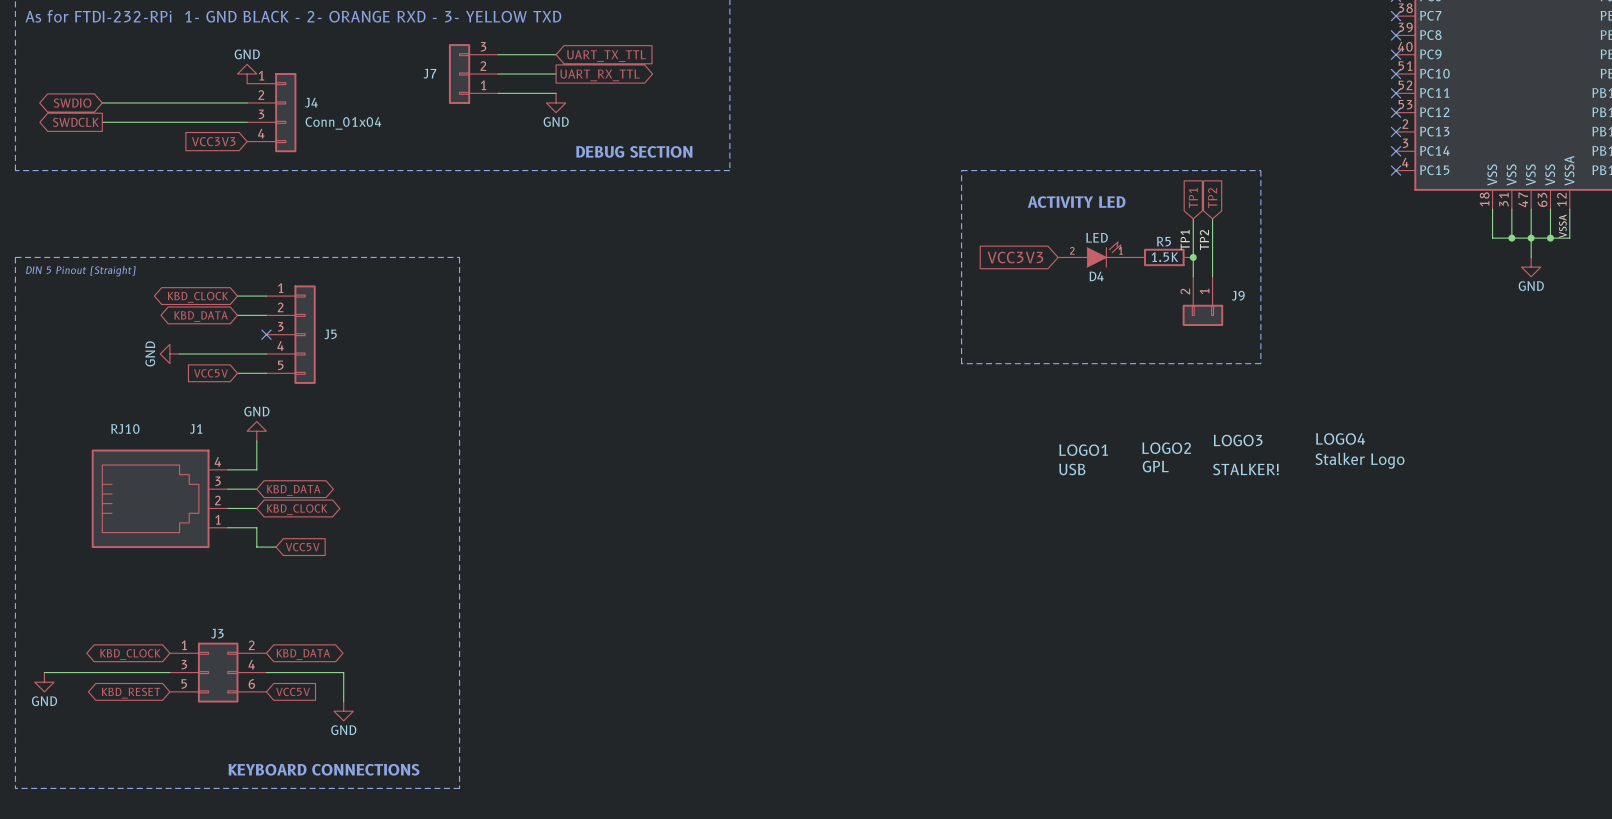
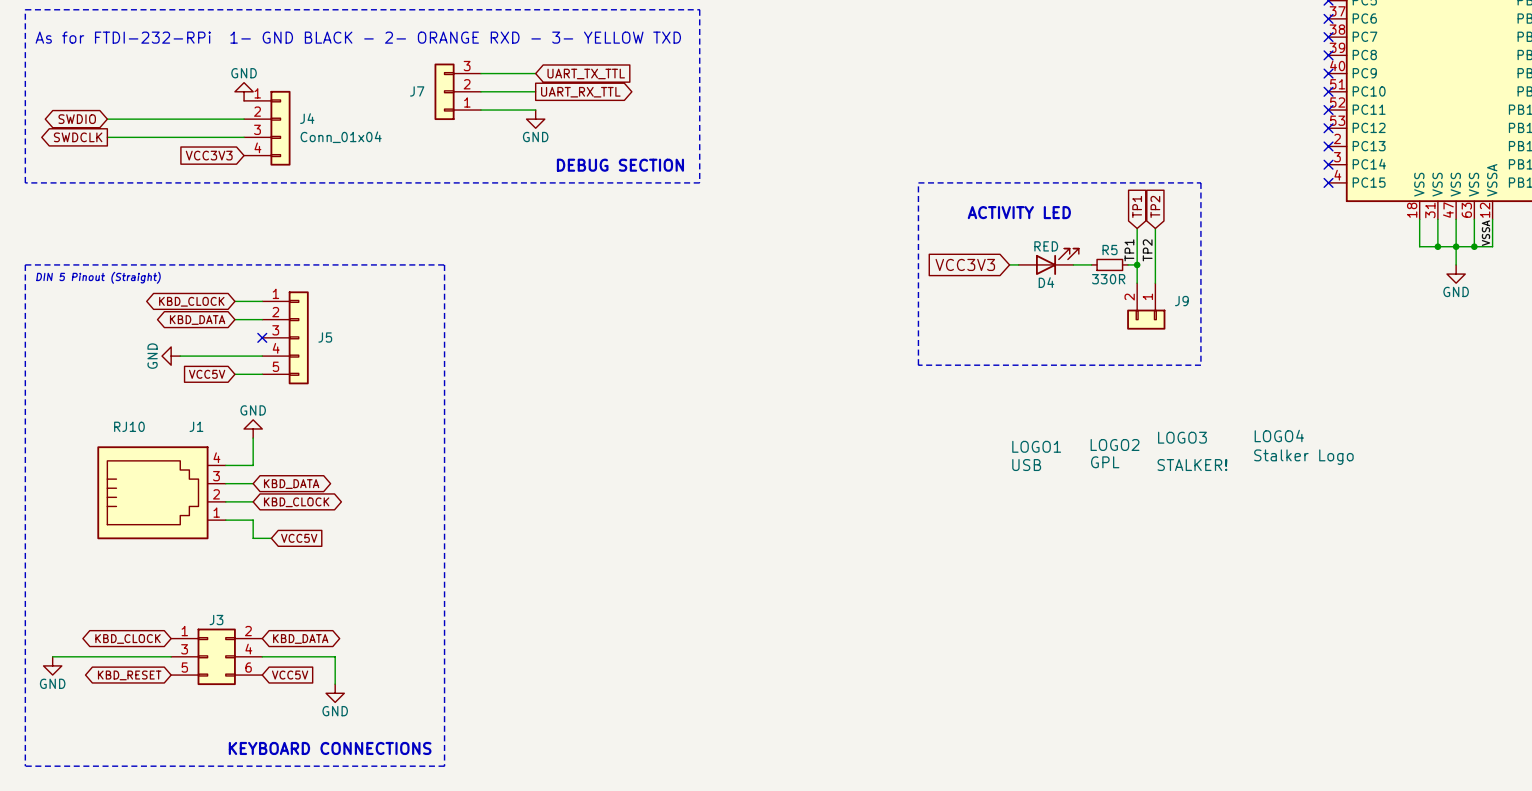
D4 value: LED (1097, 237) -> RED (1046, 246)
D4 symbol: [1058, 242, 1136, 268] -> [1018, 248, 1079, 275]
R5 symbol: [1135, 248, 1194, 267] -> [1091, 258, 1129, 272]
R5 value: 1.5K (1164, 257) -> 330R (1108, 279)

